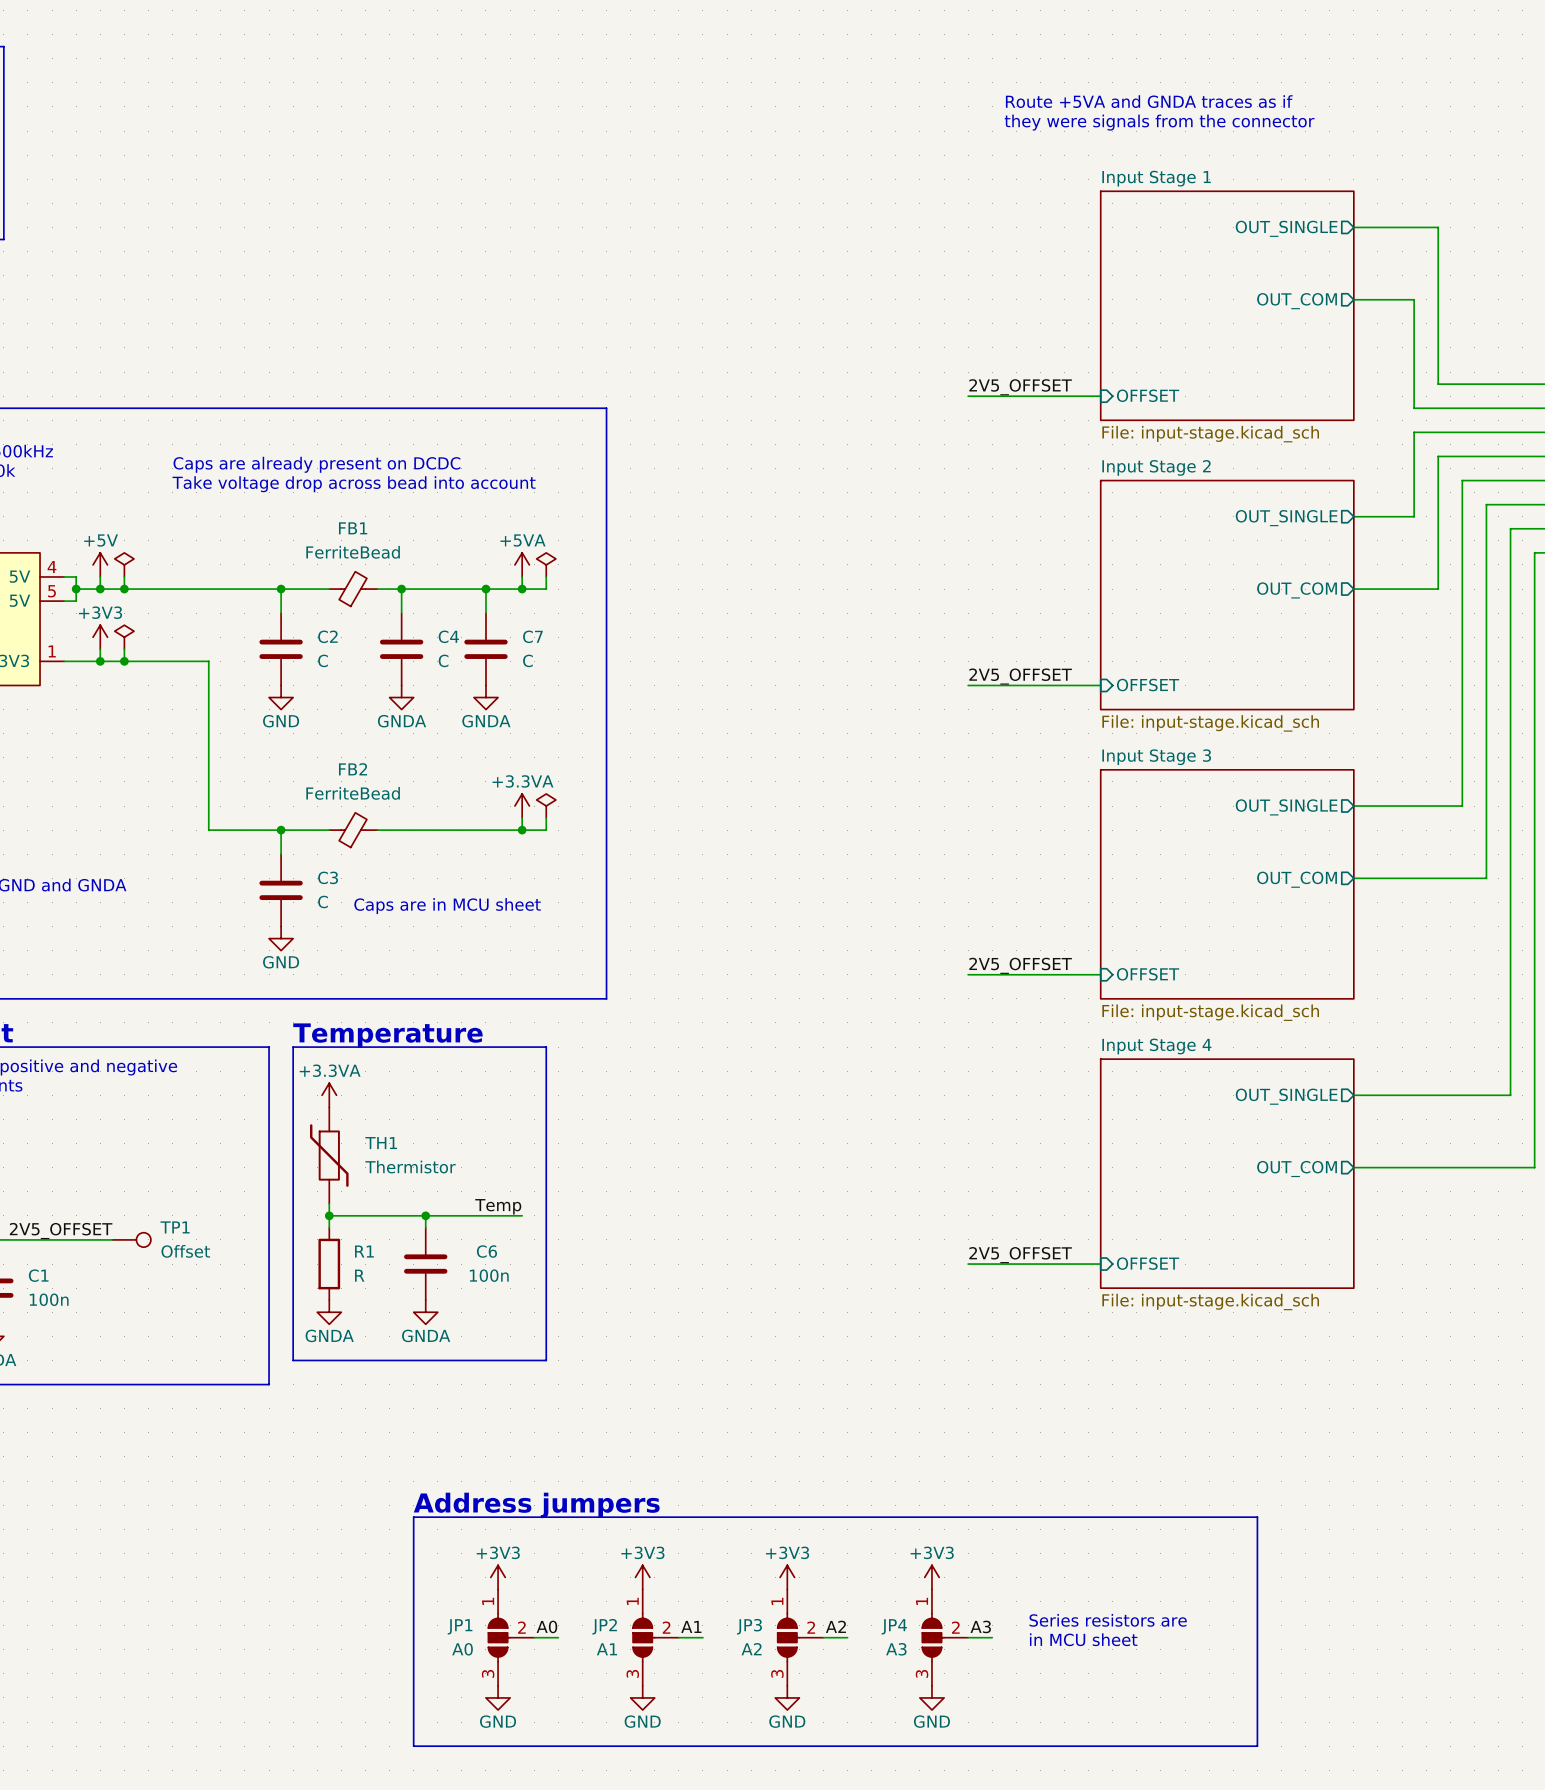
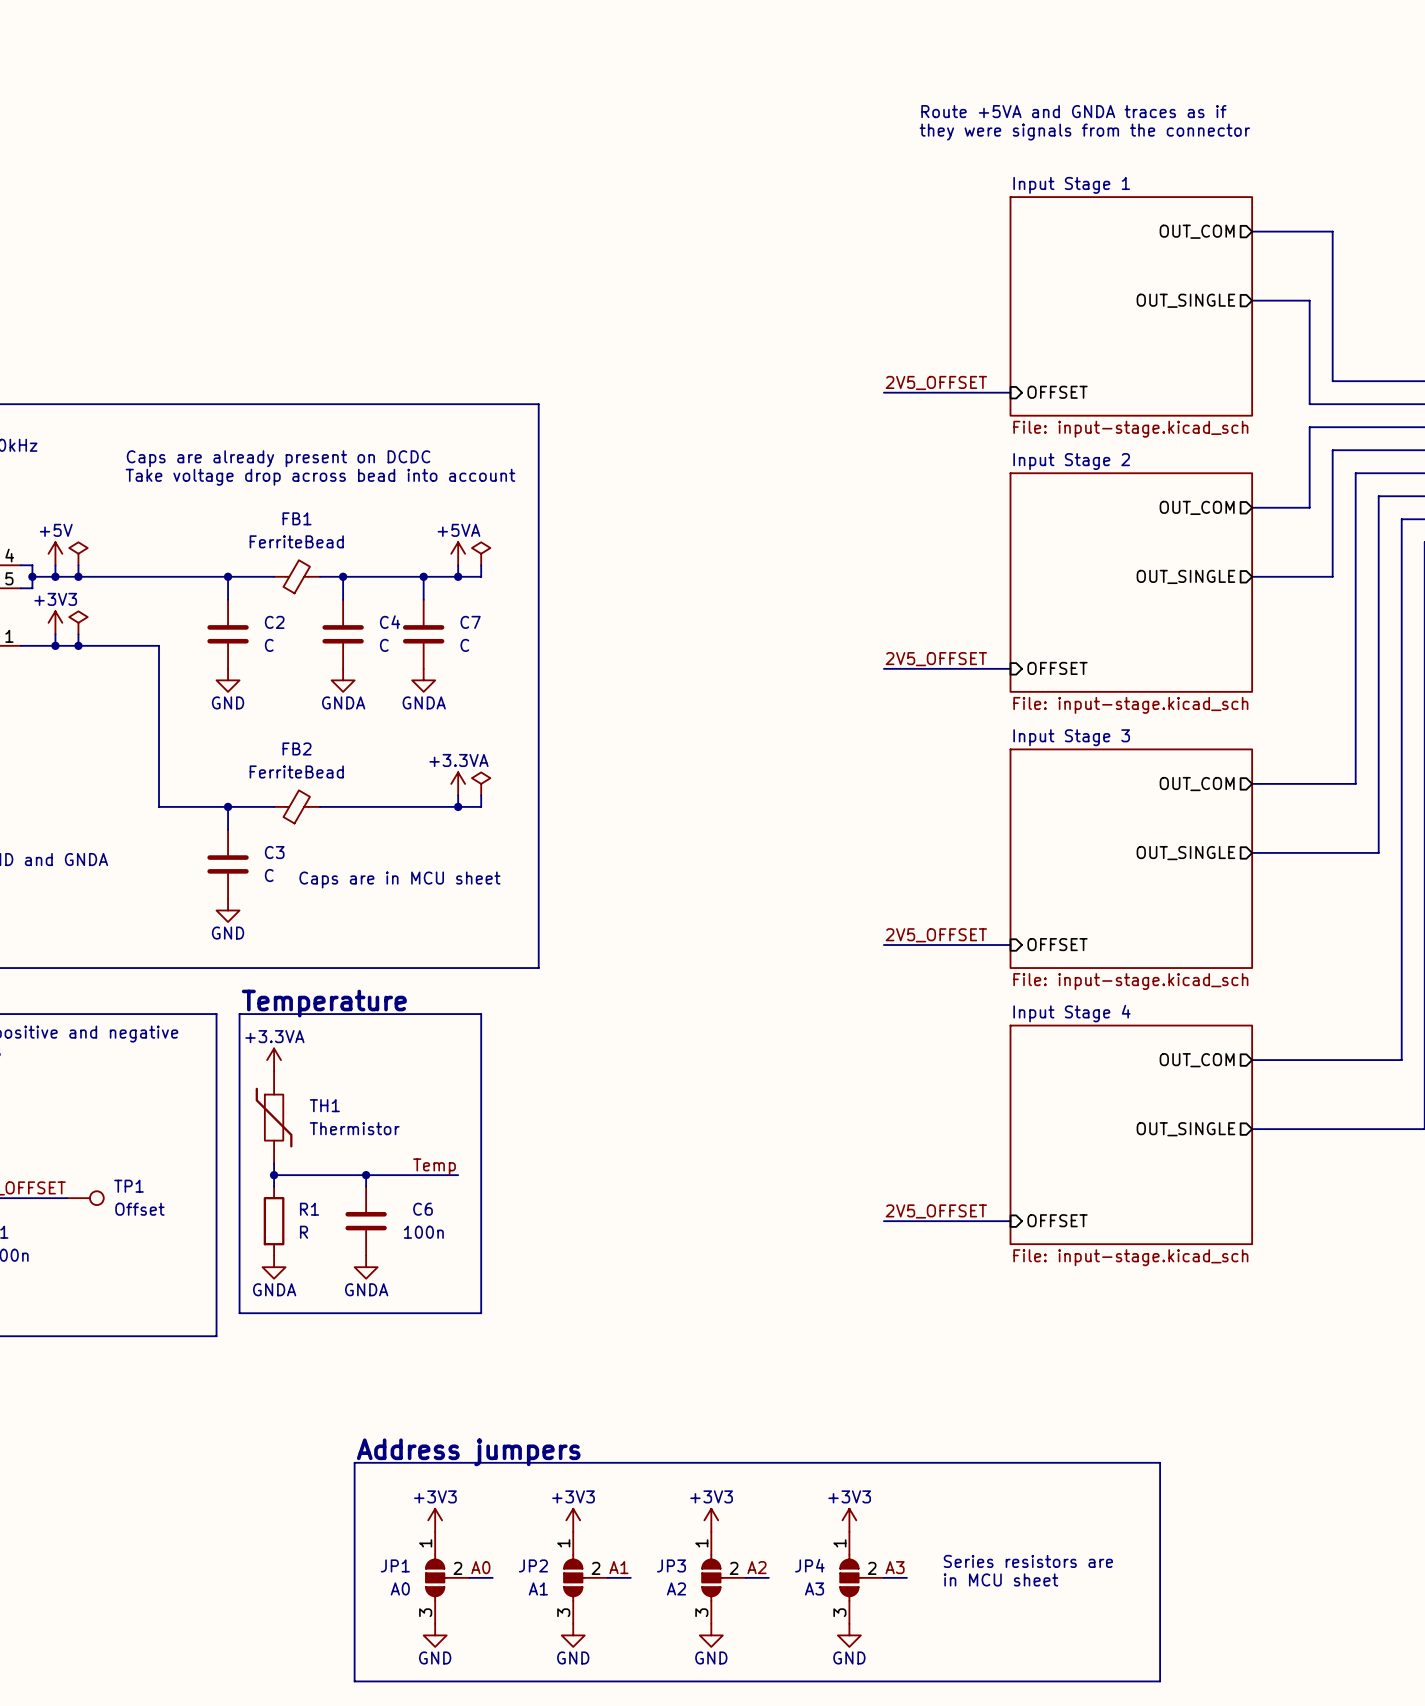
sheet pin: OUT_SINGLE (1286, 228) -> OUT_COM (1197, 231)
sheet pin: OUT_COM (1297, 301) -> OUT_SINGLE (1185, 300)
sheet pin: OUT_SINGLE (1286, 518) -> OUT_COM (1197, 507)
sheet pin: OUT_COM (1297, 590) -> OUT_SINGLE (1185, 576)
sheet pin: OUT_SINGLE (1286, 807) -> OUT_COM (1197, 784)
sheet pin: OUT_COM (1297, 879) -> OUT_SINGLE (1185, 853)
sheet pin: OUT_SINGLE (1286, 1096) -> OUT_COM (1197, 1060)
sheet pin: OUT_COM (1297, 1169) -> OUT_SINGLE (1185, 1129)

